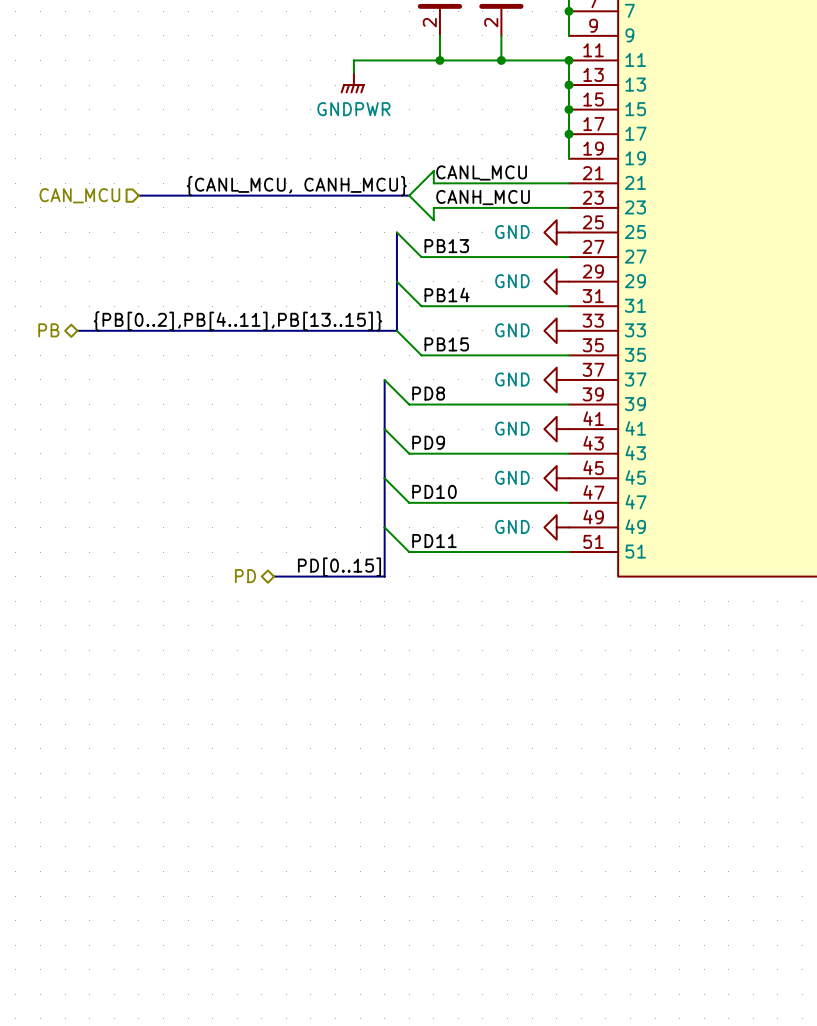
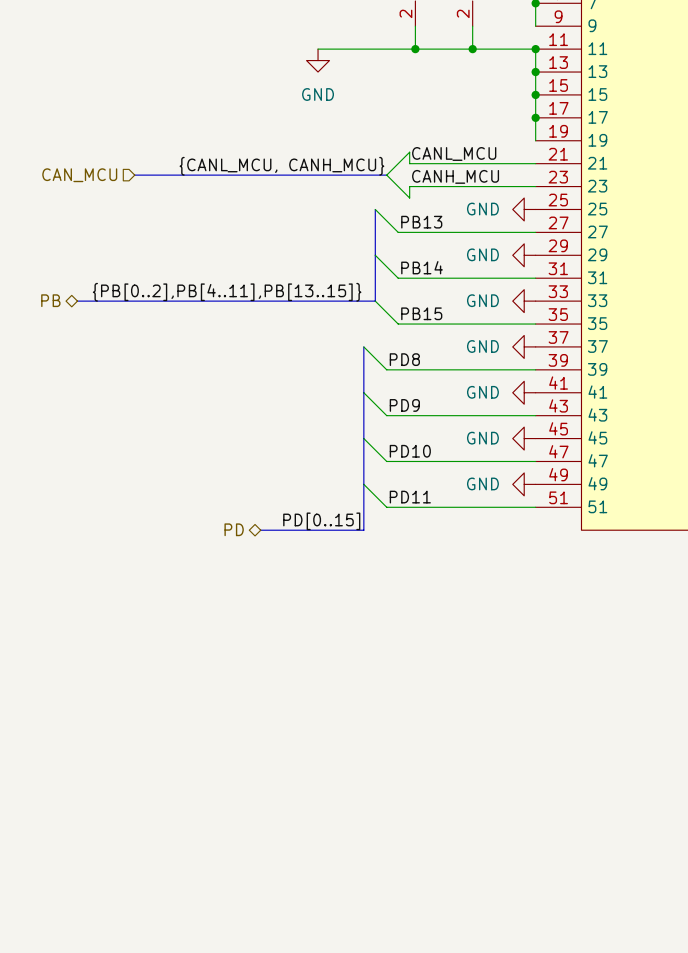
wire: (353, 60) (353, 72) -> (335, 49) (318, 49)
power symbol: none -> GND (318, 60)
power symbol: GNDPWR (352, 83) -> none

